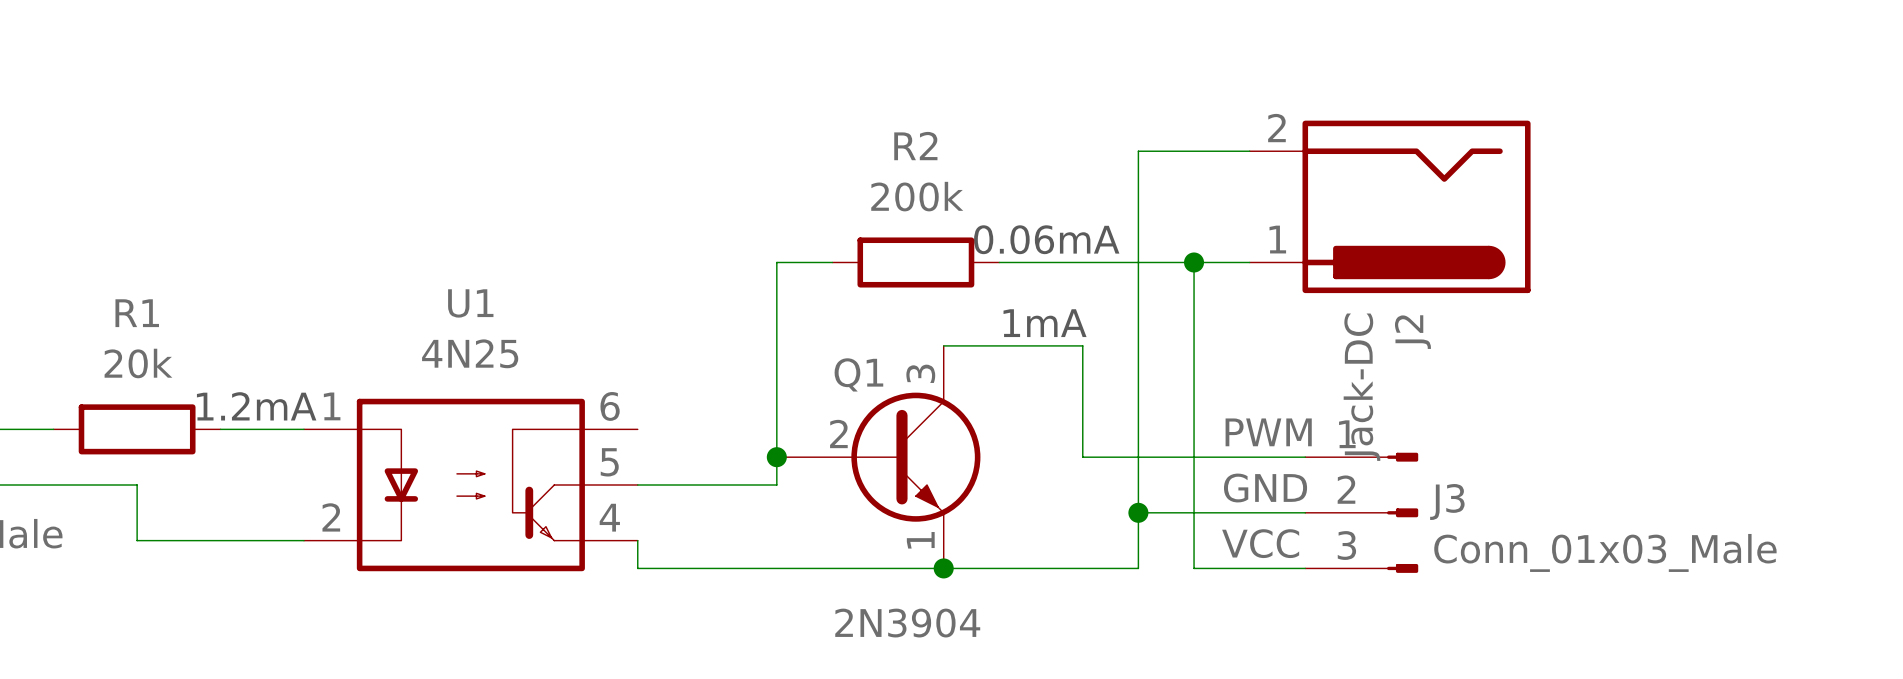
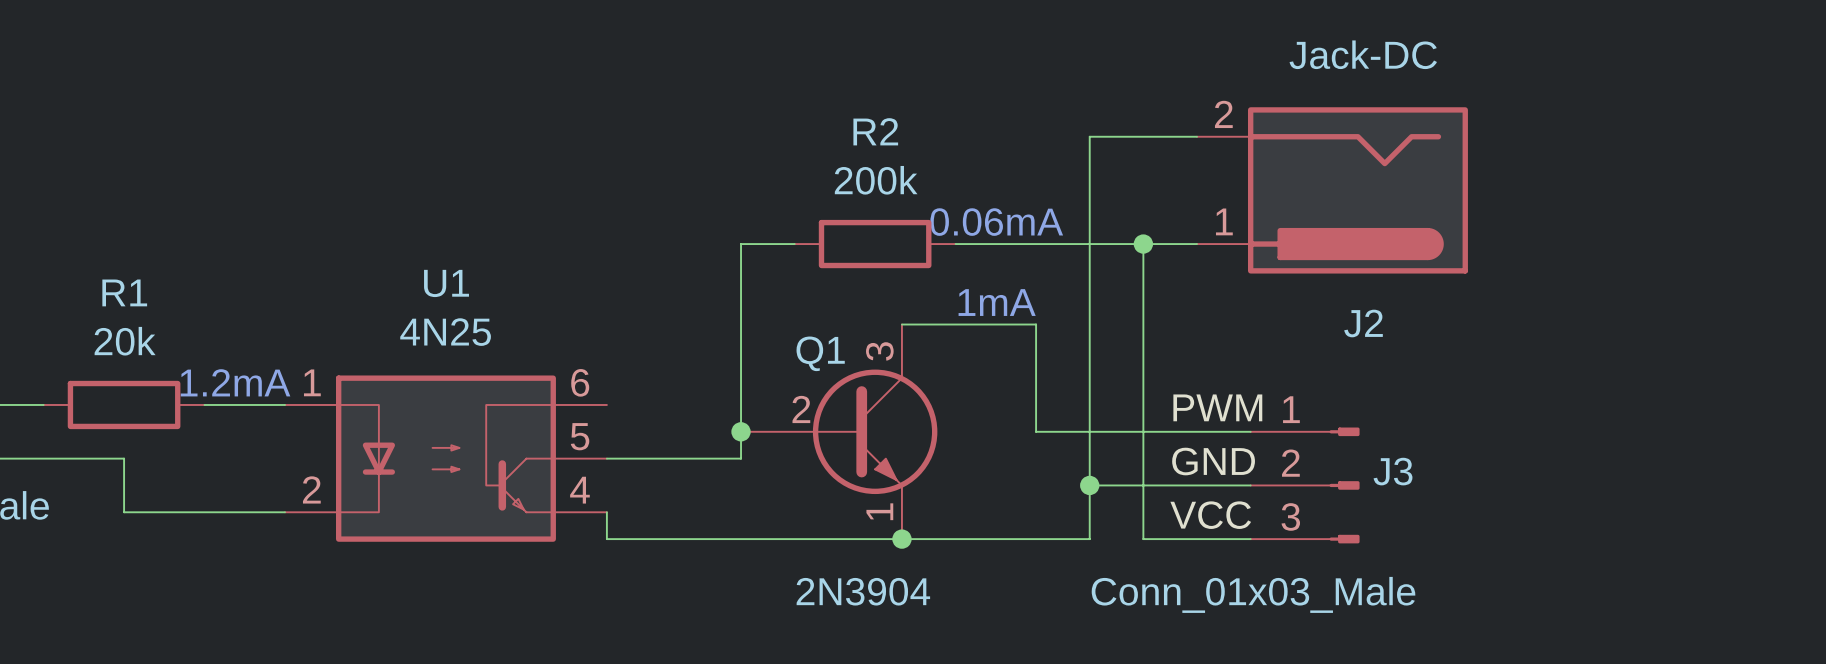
J2 name rotation: 0° (1412, 332) -> 90° clockwise (1363, 323)
J2 value rotation: 0° (1361, 387) -> 90° clockwise (1363, 54)
J2 value position: Jack-DC (1361, 387) -> Jack-DC (1363, 54)
J3 value position: Conn_01x03_Male (1605, 552) -> Conn_01x03_Male (1253, 594)

